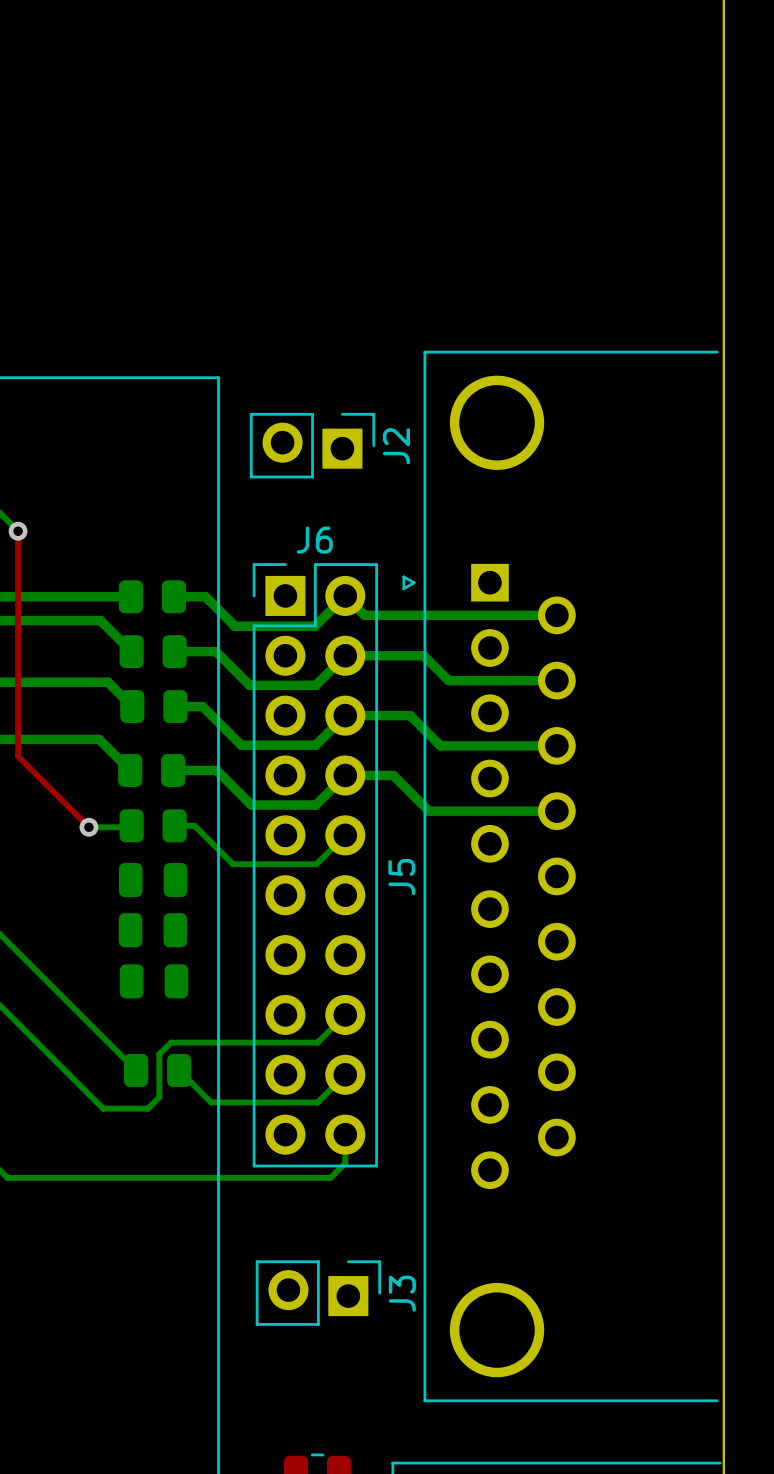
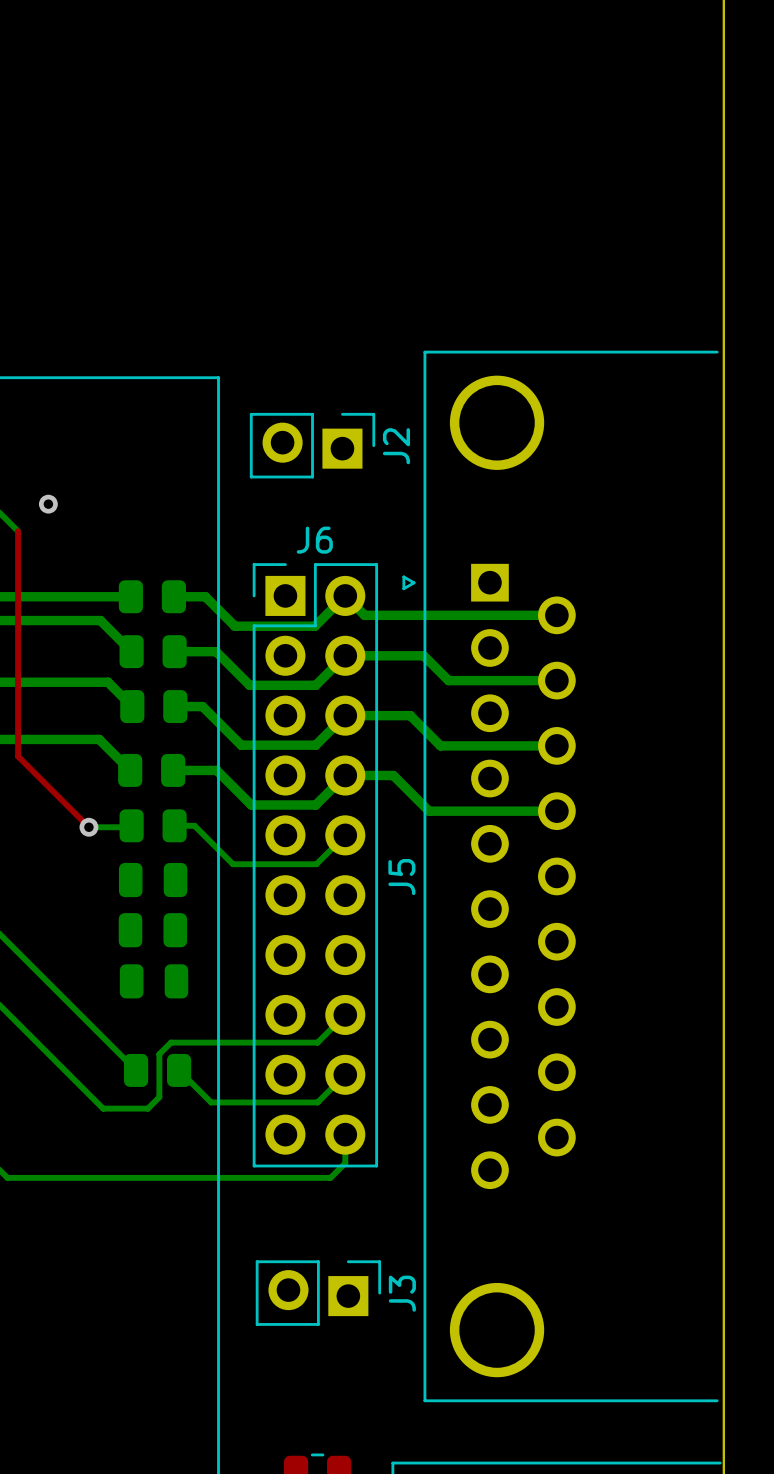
via position: (18, 531) -> (48, 504)

